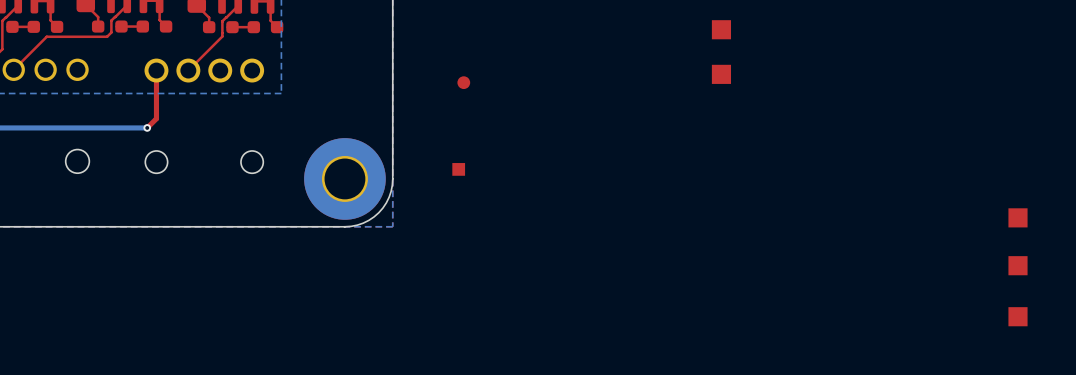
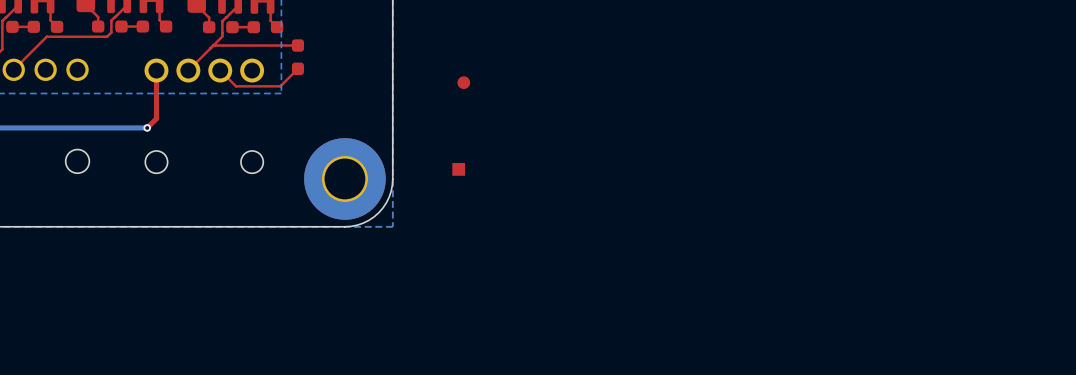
part: (721, 29) -> none
top track: none -> (297, 45) (213, 45)
part: none -> (297, 57)
top track: none -> (297, 68) (280, 86) (236, 86) (220, 70)
part: (721, 74) -> none
part: (1017, 217) -> none
part: (1017, 265) -> none
part: (1017, 316) -> none

